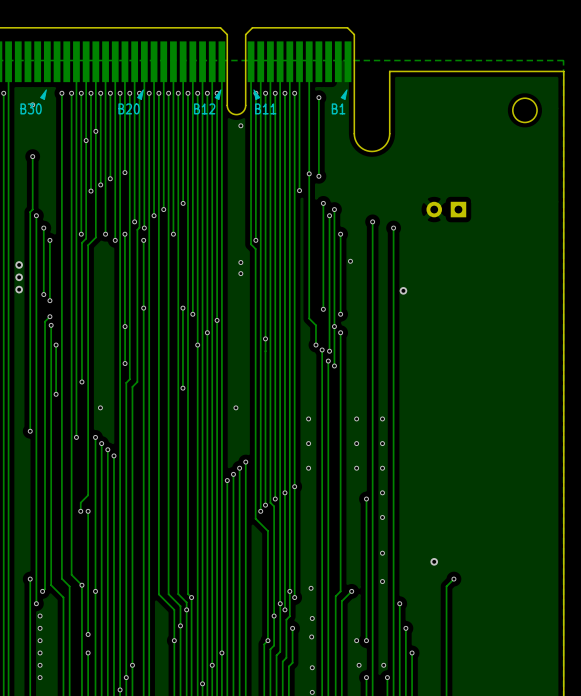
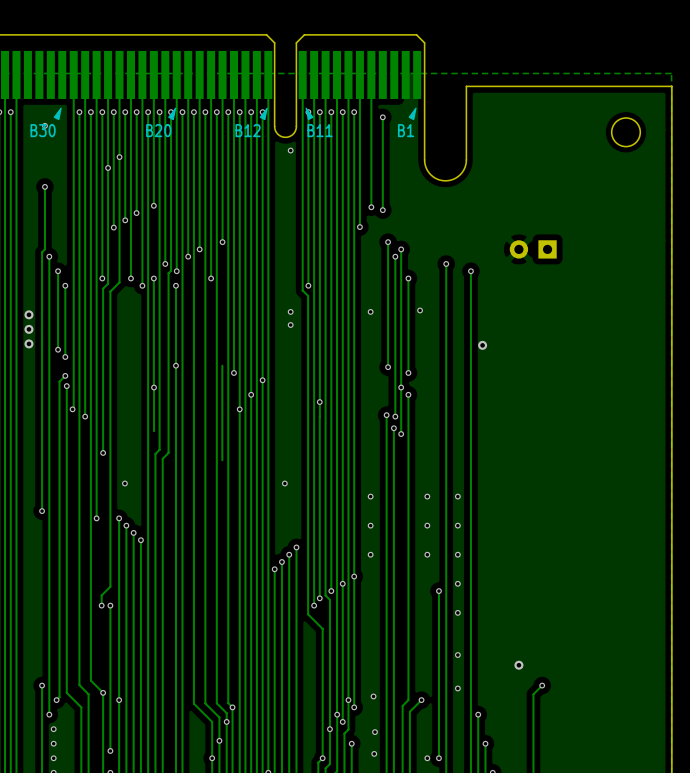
track: none -> (73, 74) (73, 409)
track: none -> (85, 74) (85, 416)
track: (309, 173) (309, 318) (315, 325) (315, 345) -> none
via: none -> (370, 311)
via: (182, 308) -> none
track: (56, 345) (56, 394) -> none
via: (315, 345) -> none
via: none -> (85, 416)
via: (125, 363) -> none
via: (182, 388) -> none
via: (56, 394) -> none

